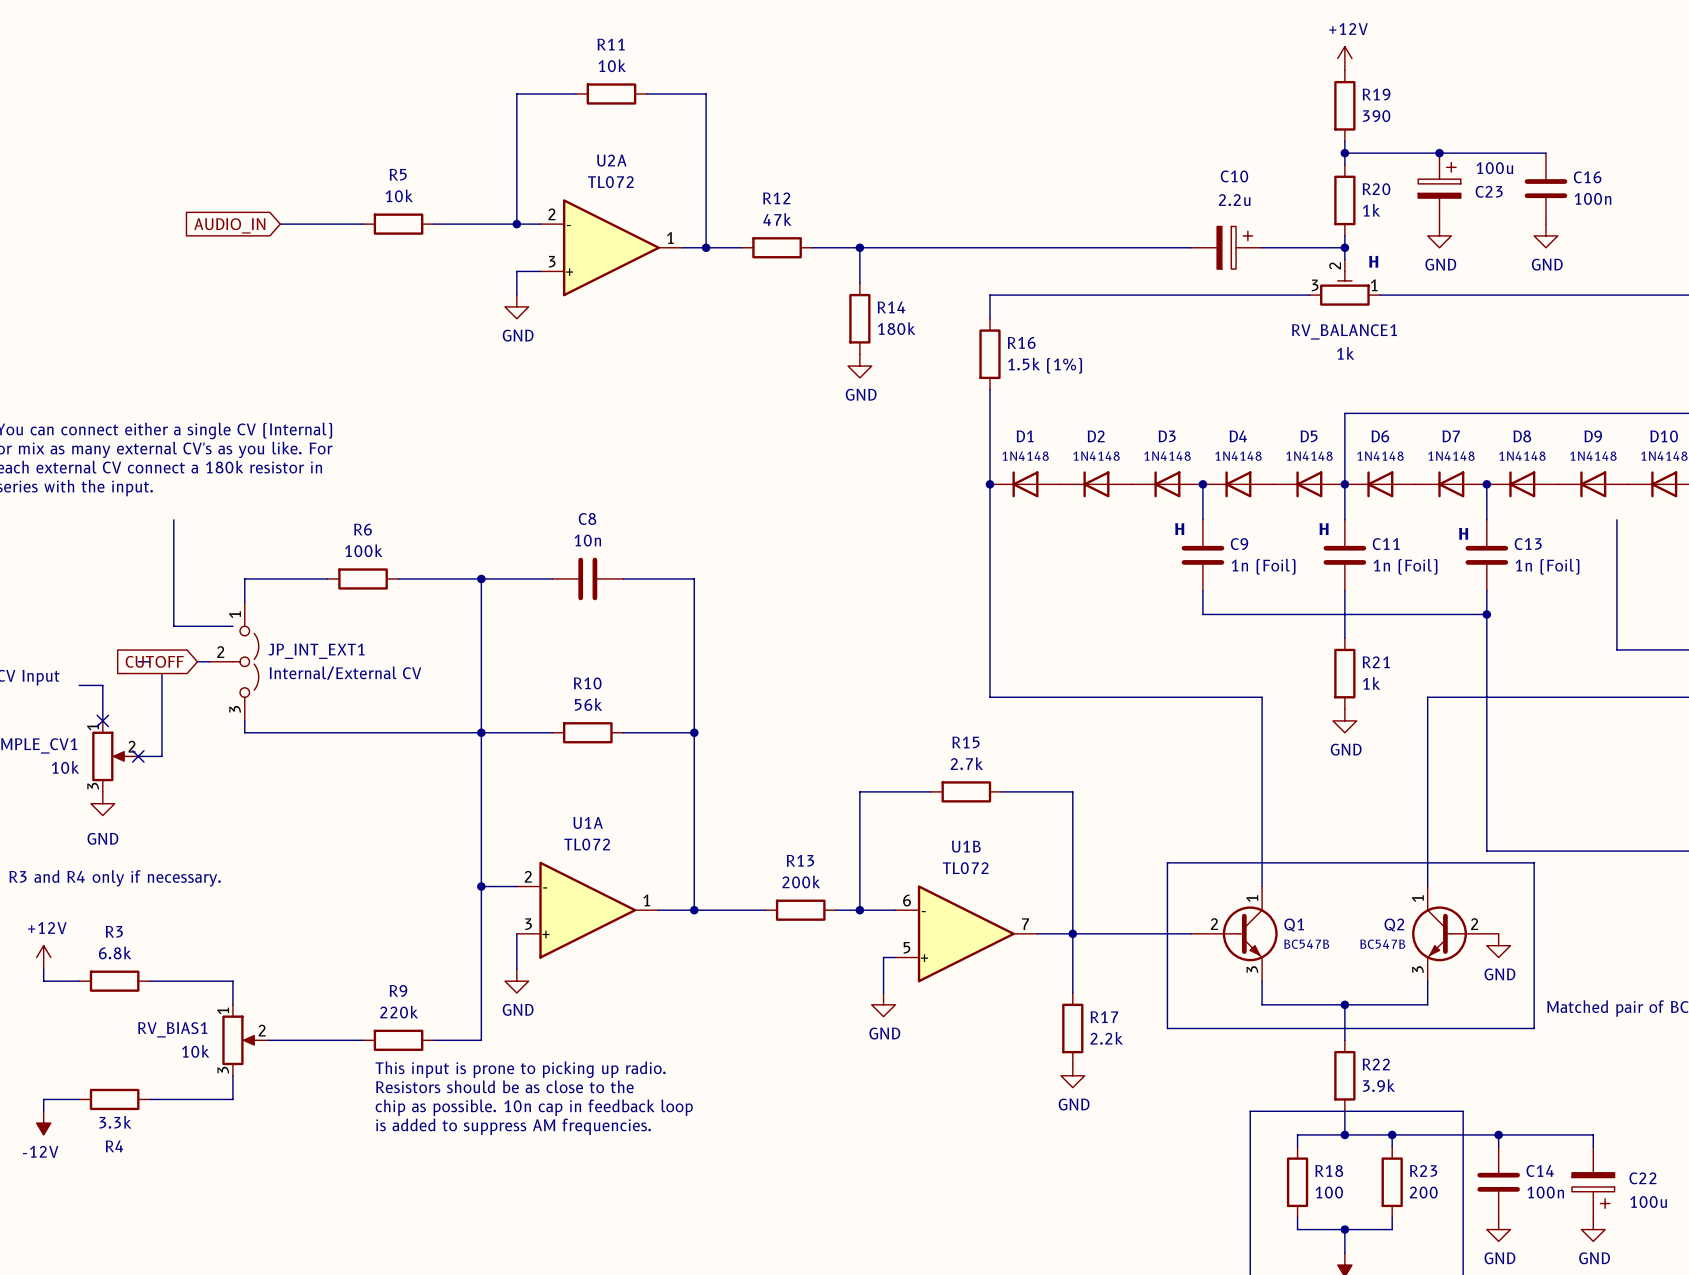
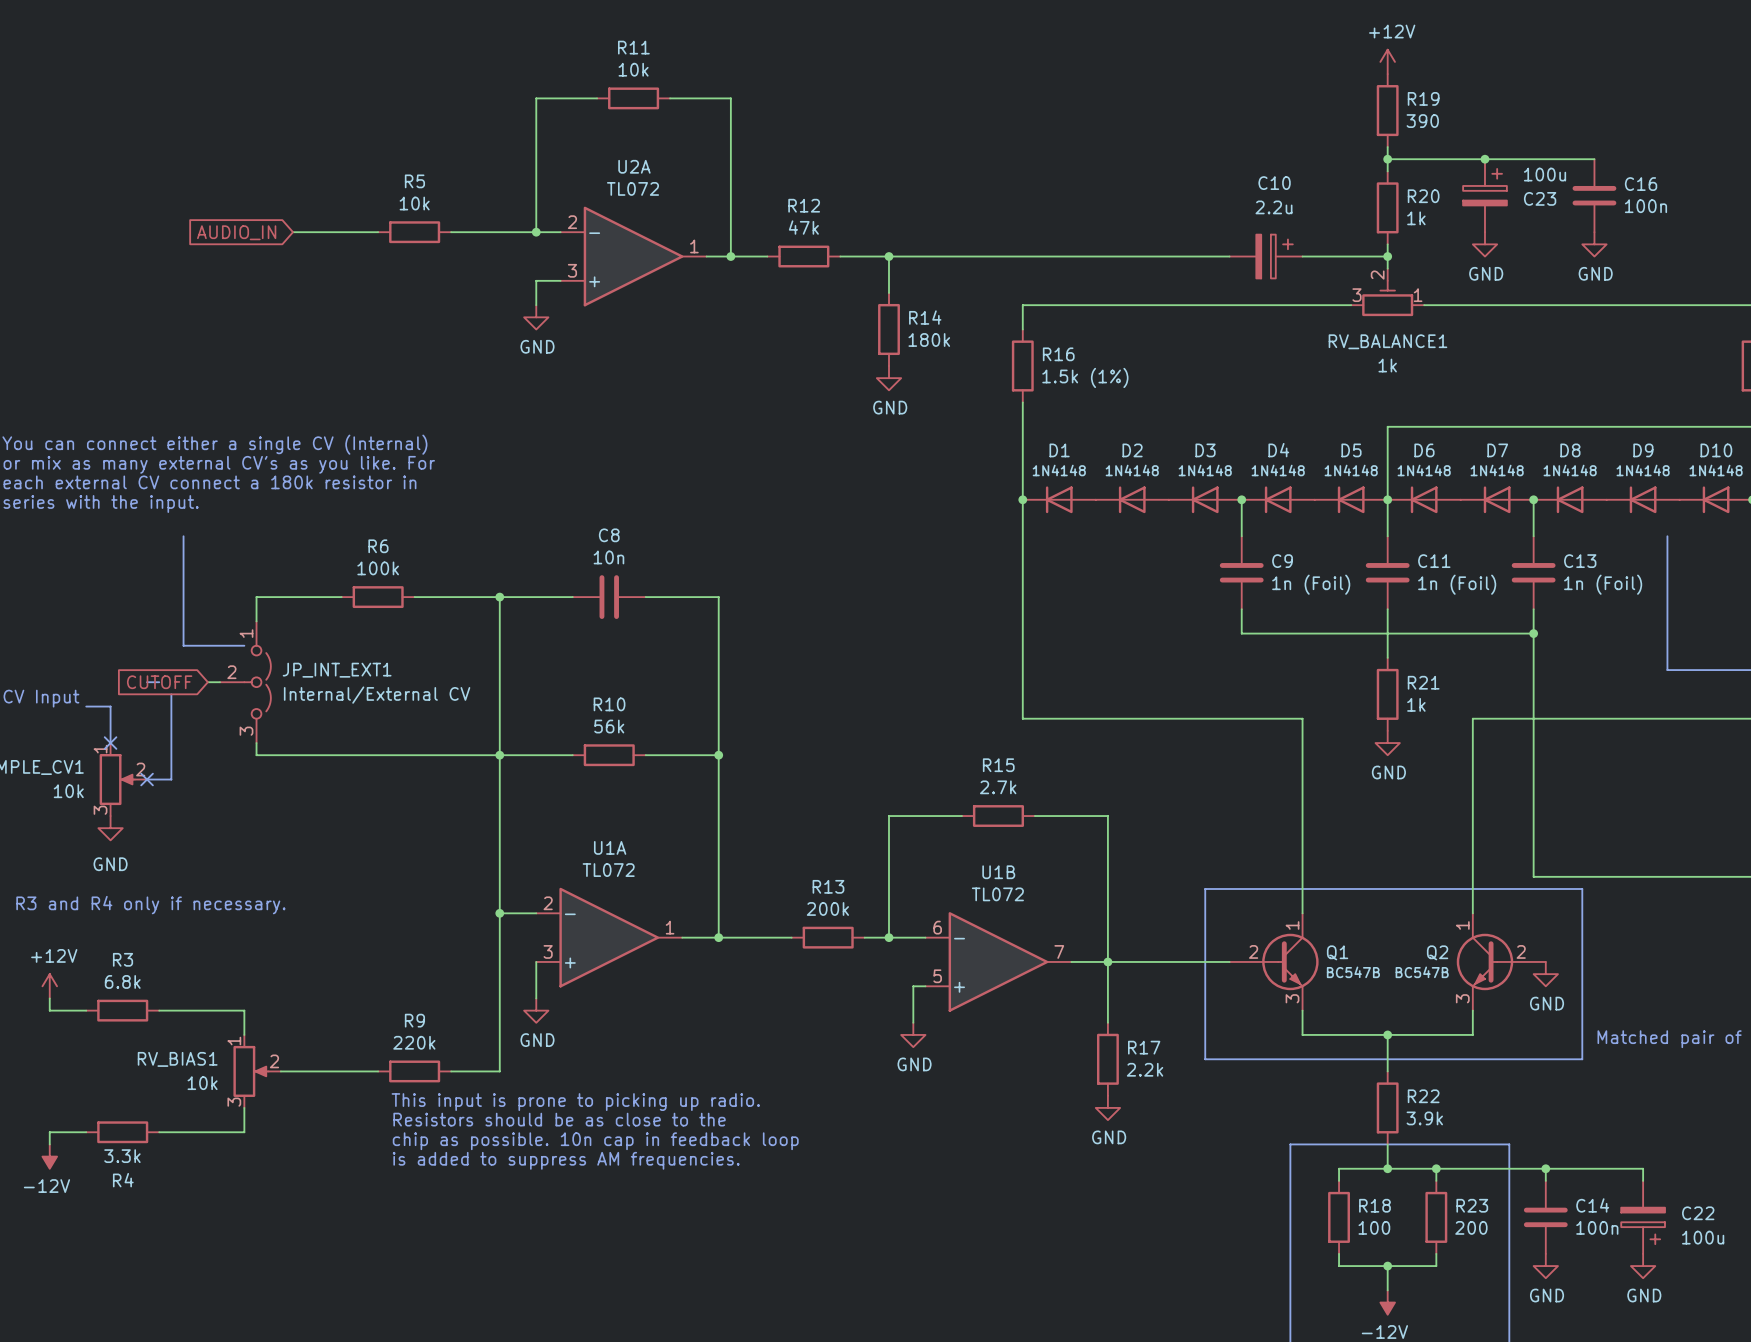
text: H (1373, 261) -> none
text: H (1179, 529) -> none
text: H (1324, 529) -> none
text: H (1463, 533) -> none

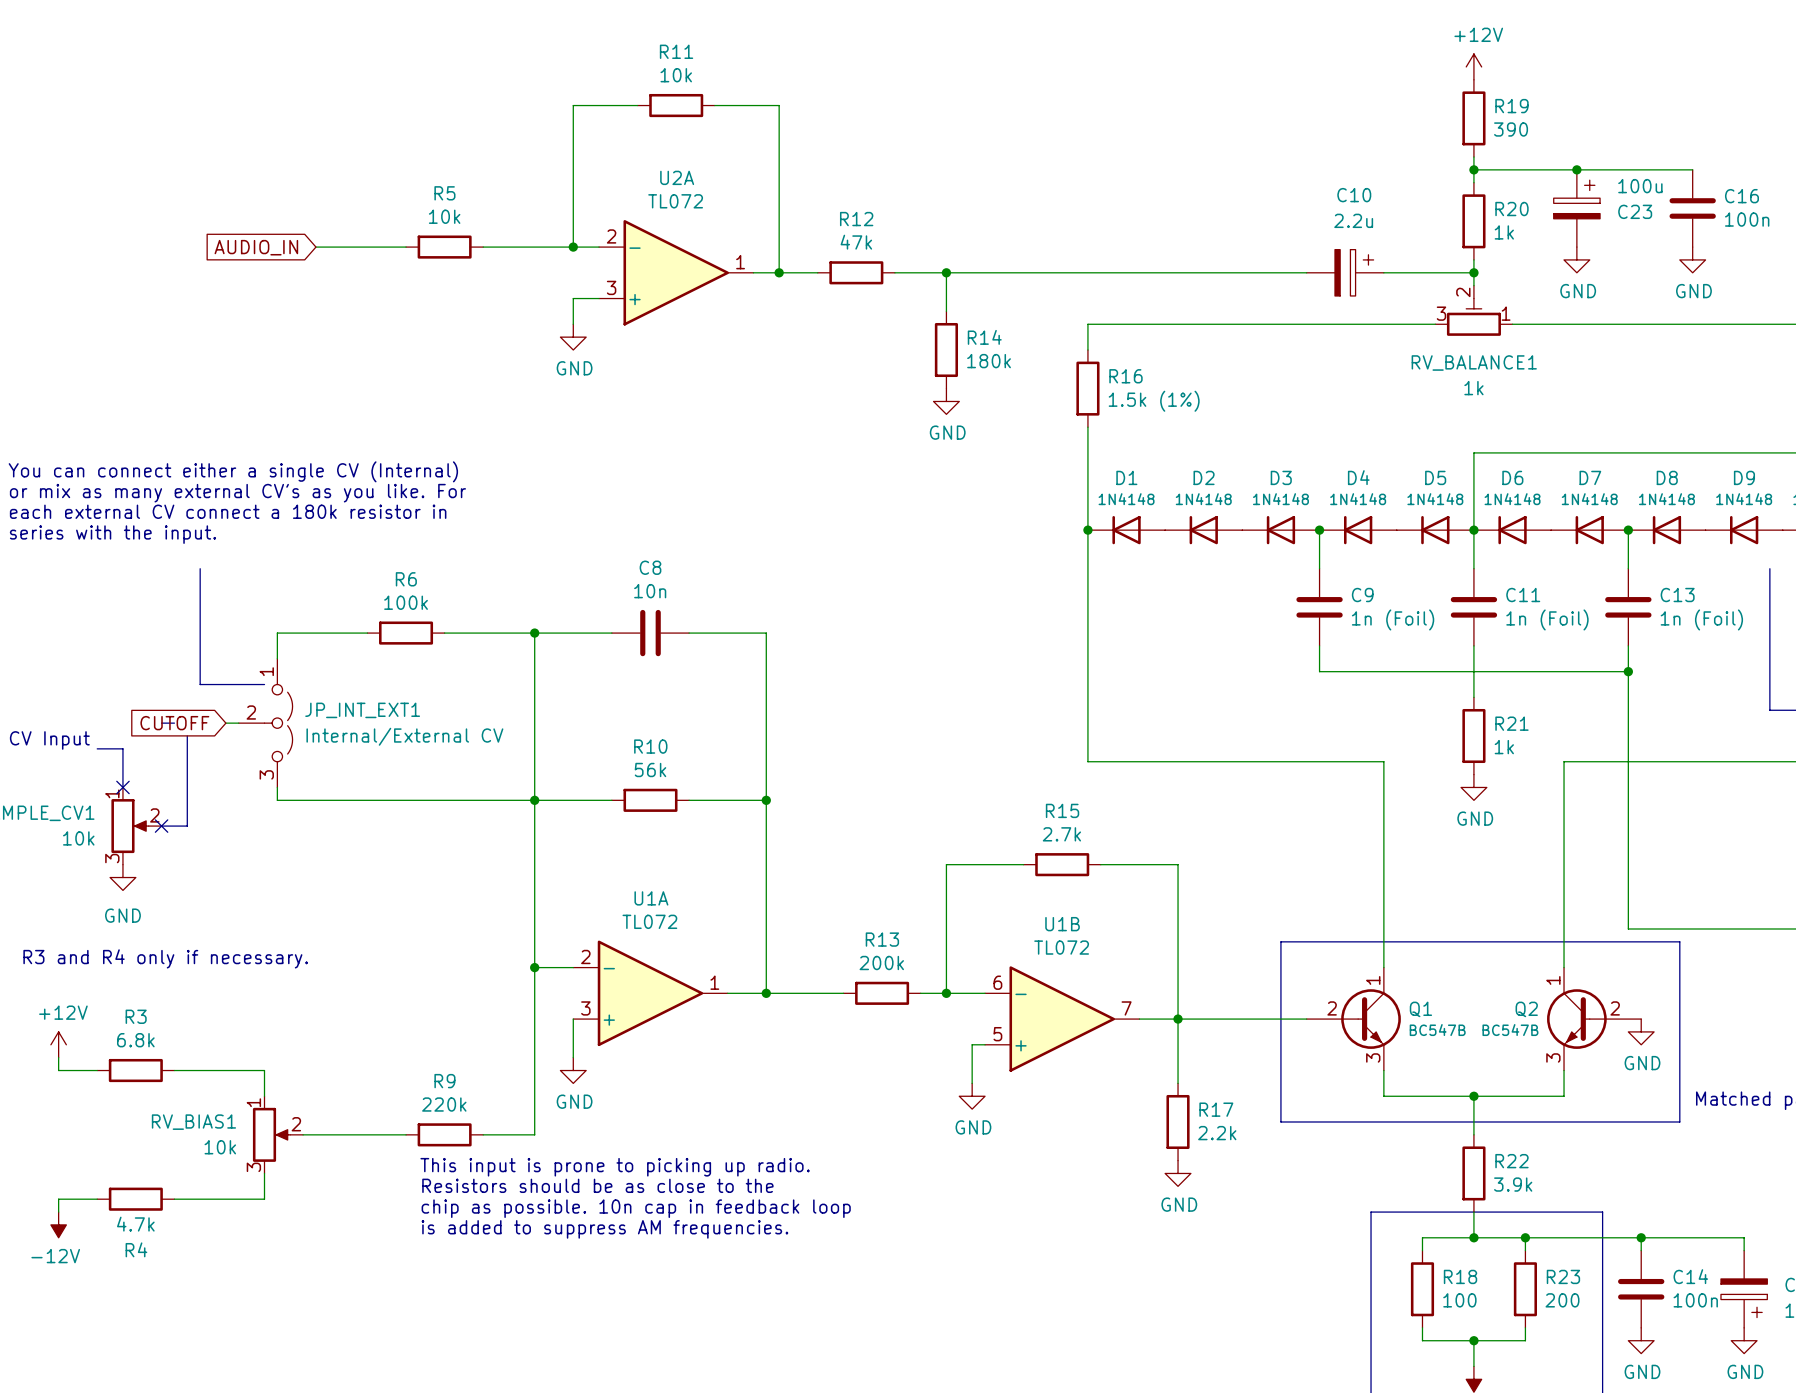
R4 value: 3.3k (122, 1156) -> 4.7k (135, 1224)

